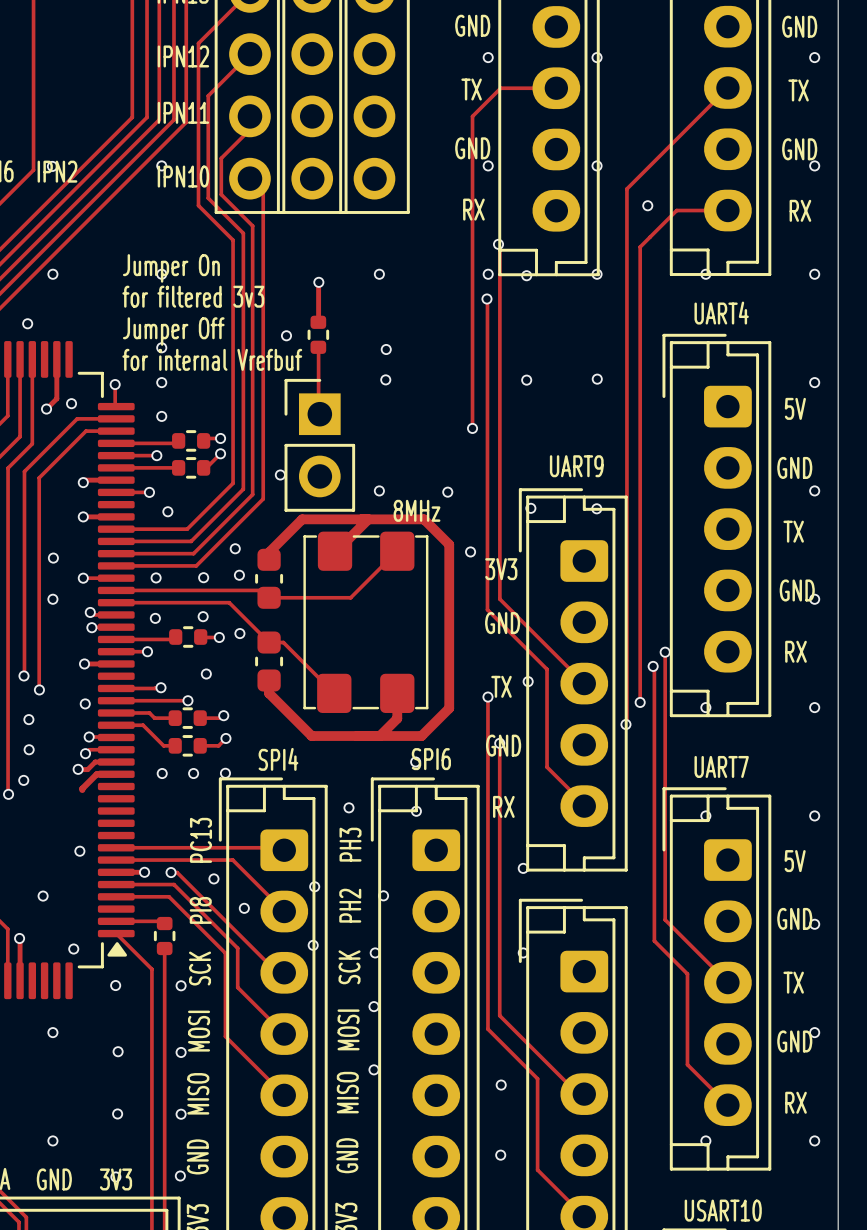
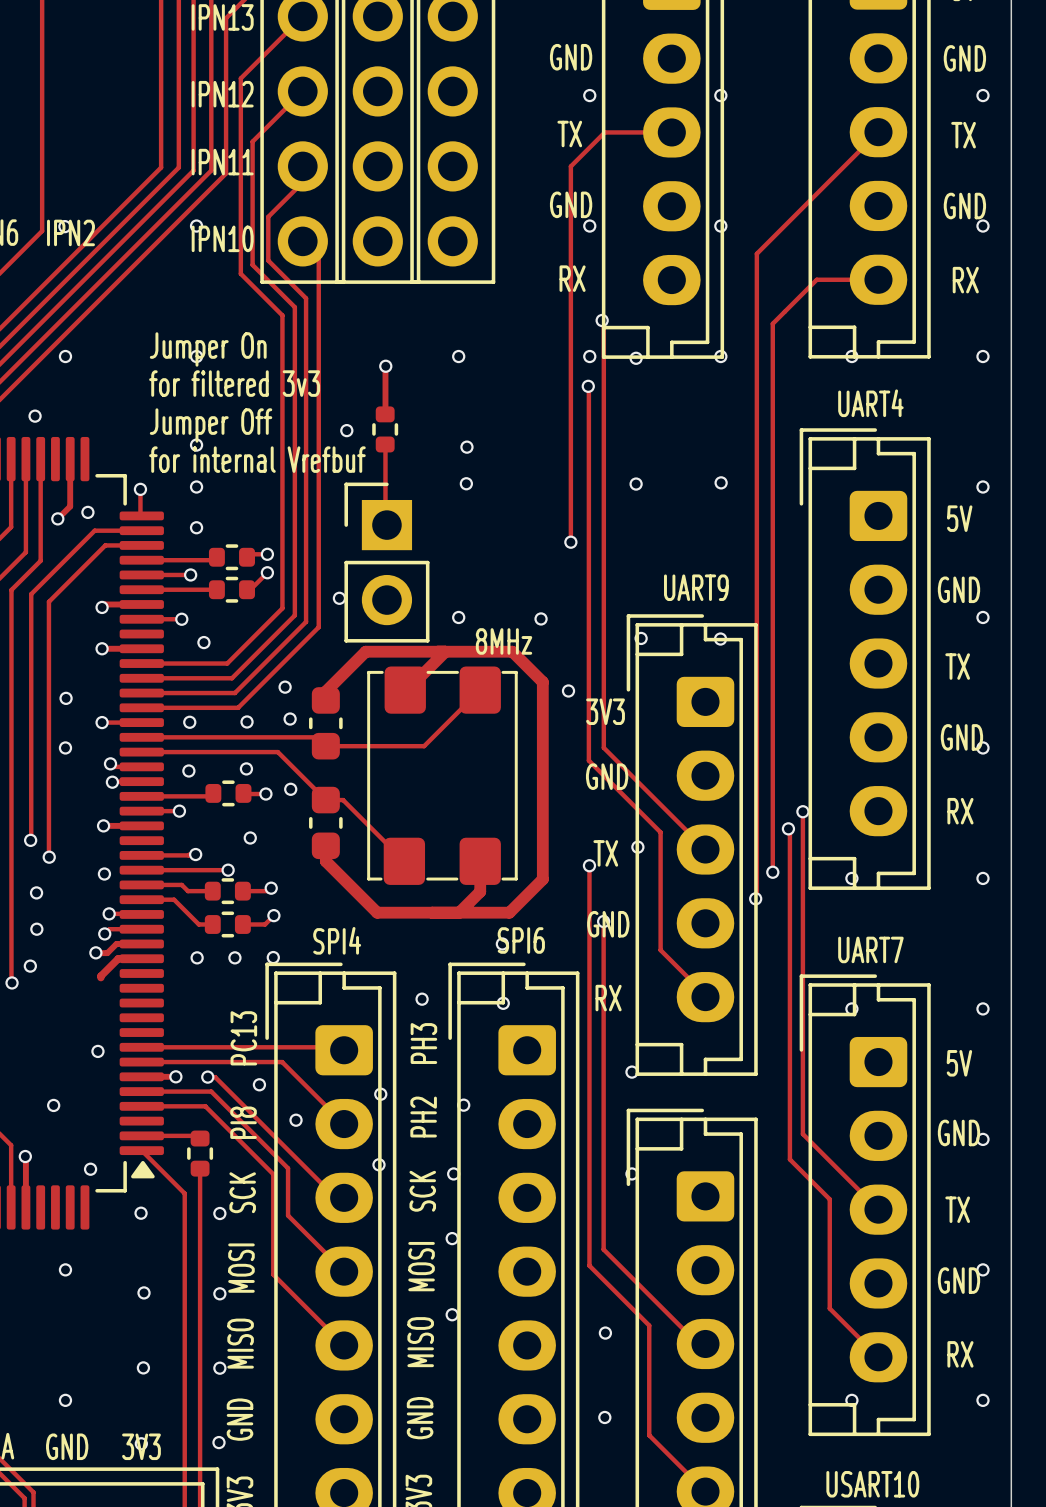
via: (647, 205) -> none

